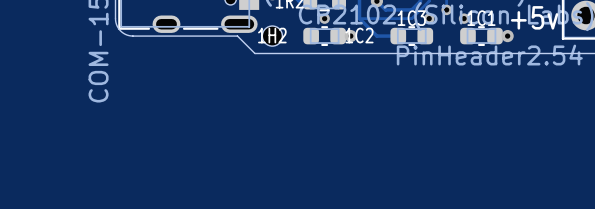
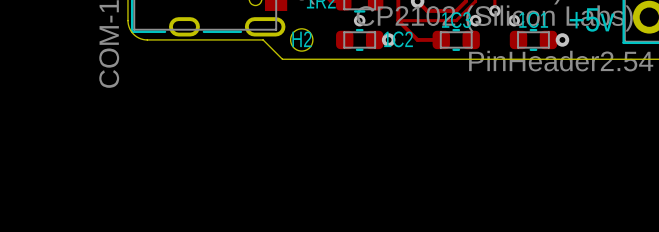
1H2 name: 1H2 (272, 35) -> H2 (302, 39)

